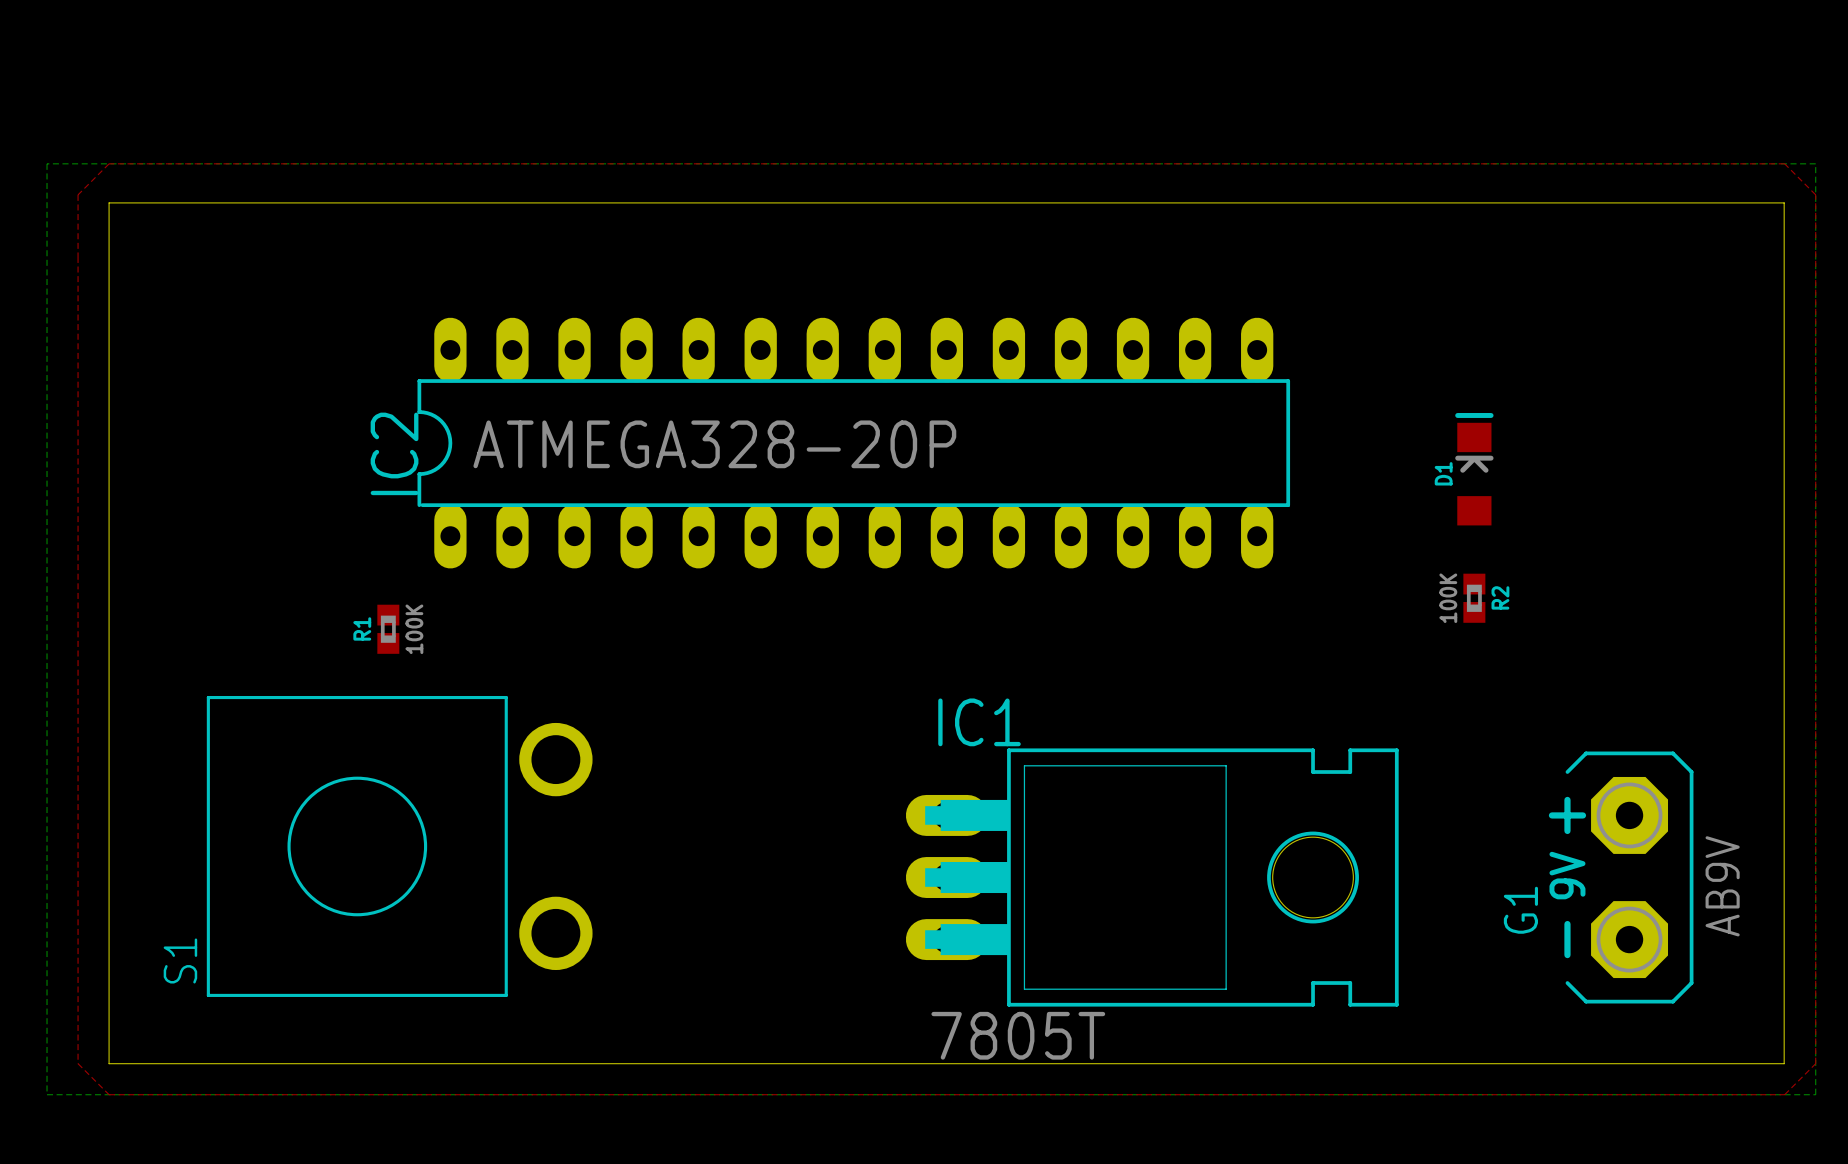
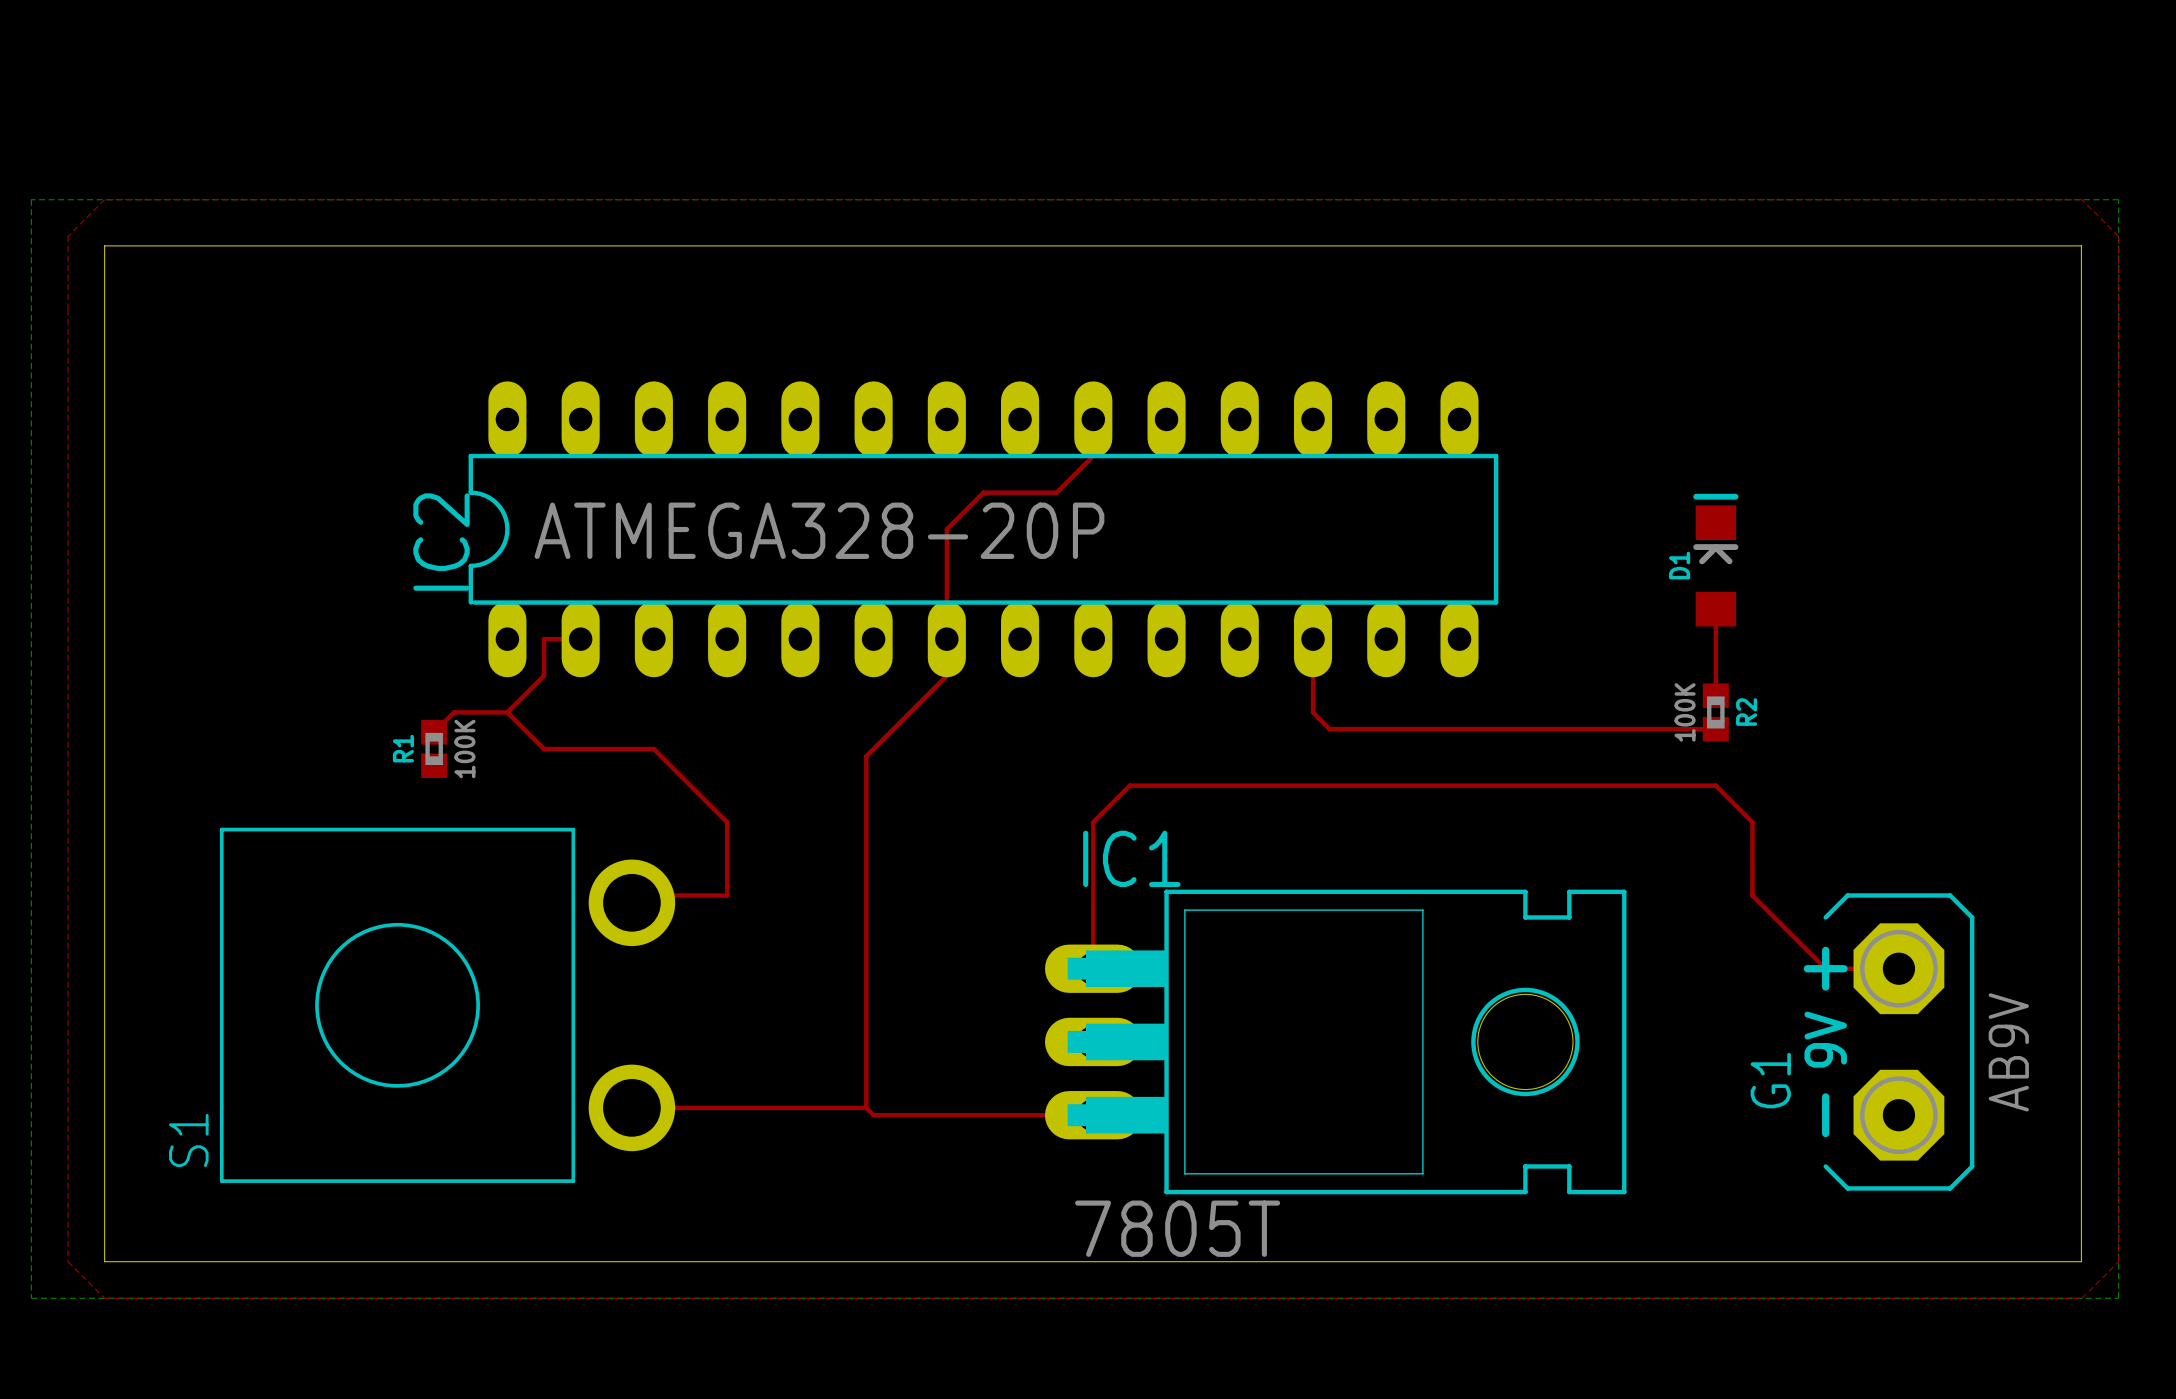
top track: none -> (1093, 419) (1093, 456) (1056, 492) (983, 492) (946, 529) (946, 675) (866, 756) (866, 1107)
top track: none -> (1715, 609) (1715, 695)
top track: none -> (580, 639) (544, 639) (544, 675) (507, 712)
top track: none -> (1313, 639) (1313, 712) (1329, 729) (1715, 729)
top track: none -> (507, 712) (454, 712) (434, 732)
top track: none -> (507, 712) (544, 749) (653, 749) (727, 822) (727, 895) (639, 895) (631, 902)
top track: none -> (1093, 968) (1093, 822) (1129, 785) (1715, 785) (1752, 822) (1752, 895) (1825, 968) (1898, 968)
top track: none -> (631, 1107) (866, 1107)
top track: none -> (866, 1107) (873, 1115) (1093, 1115)

